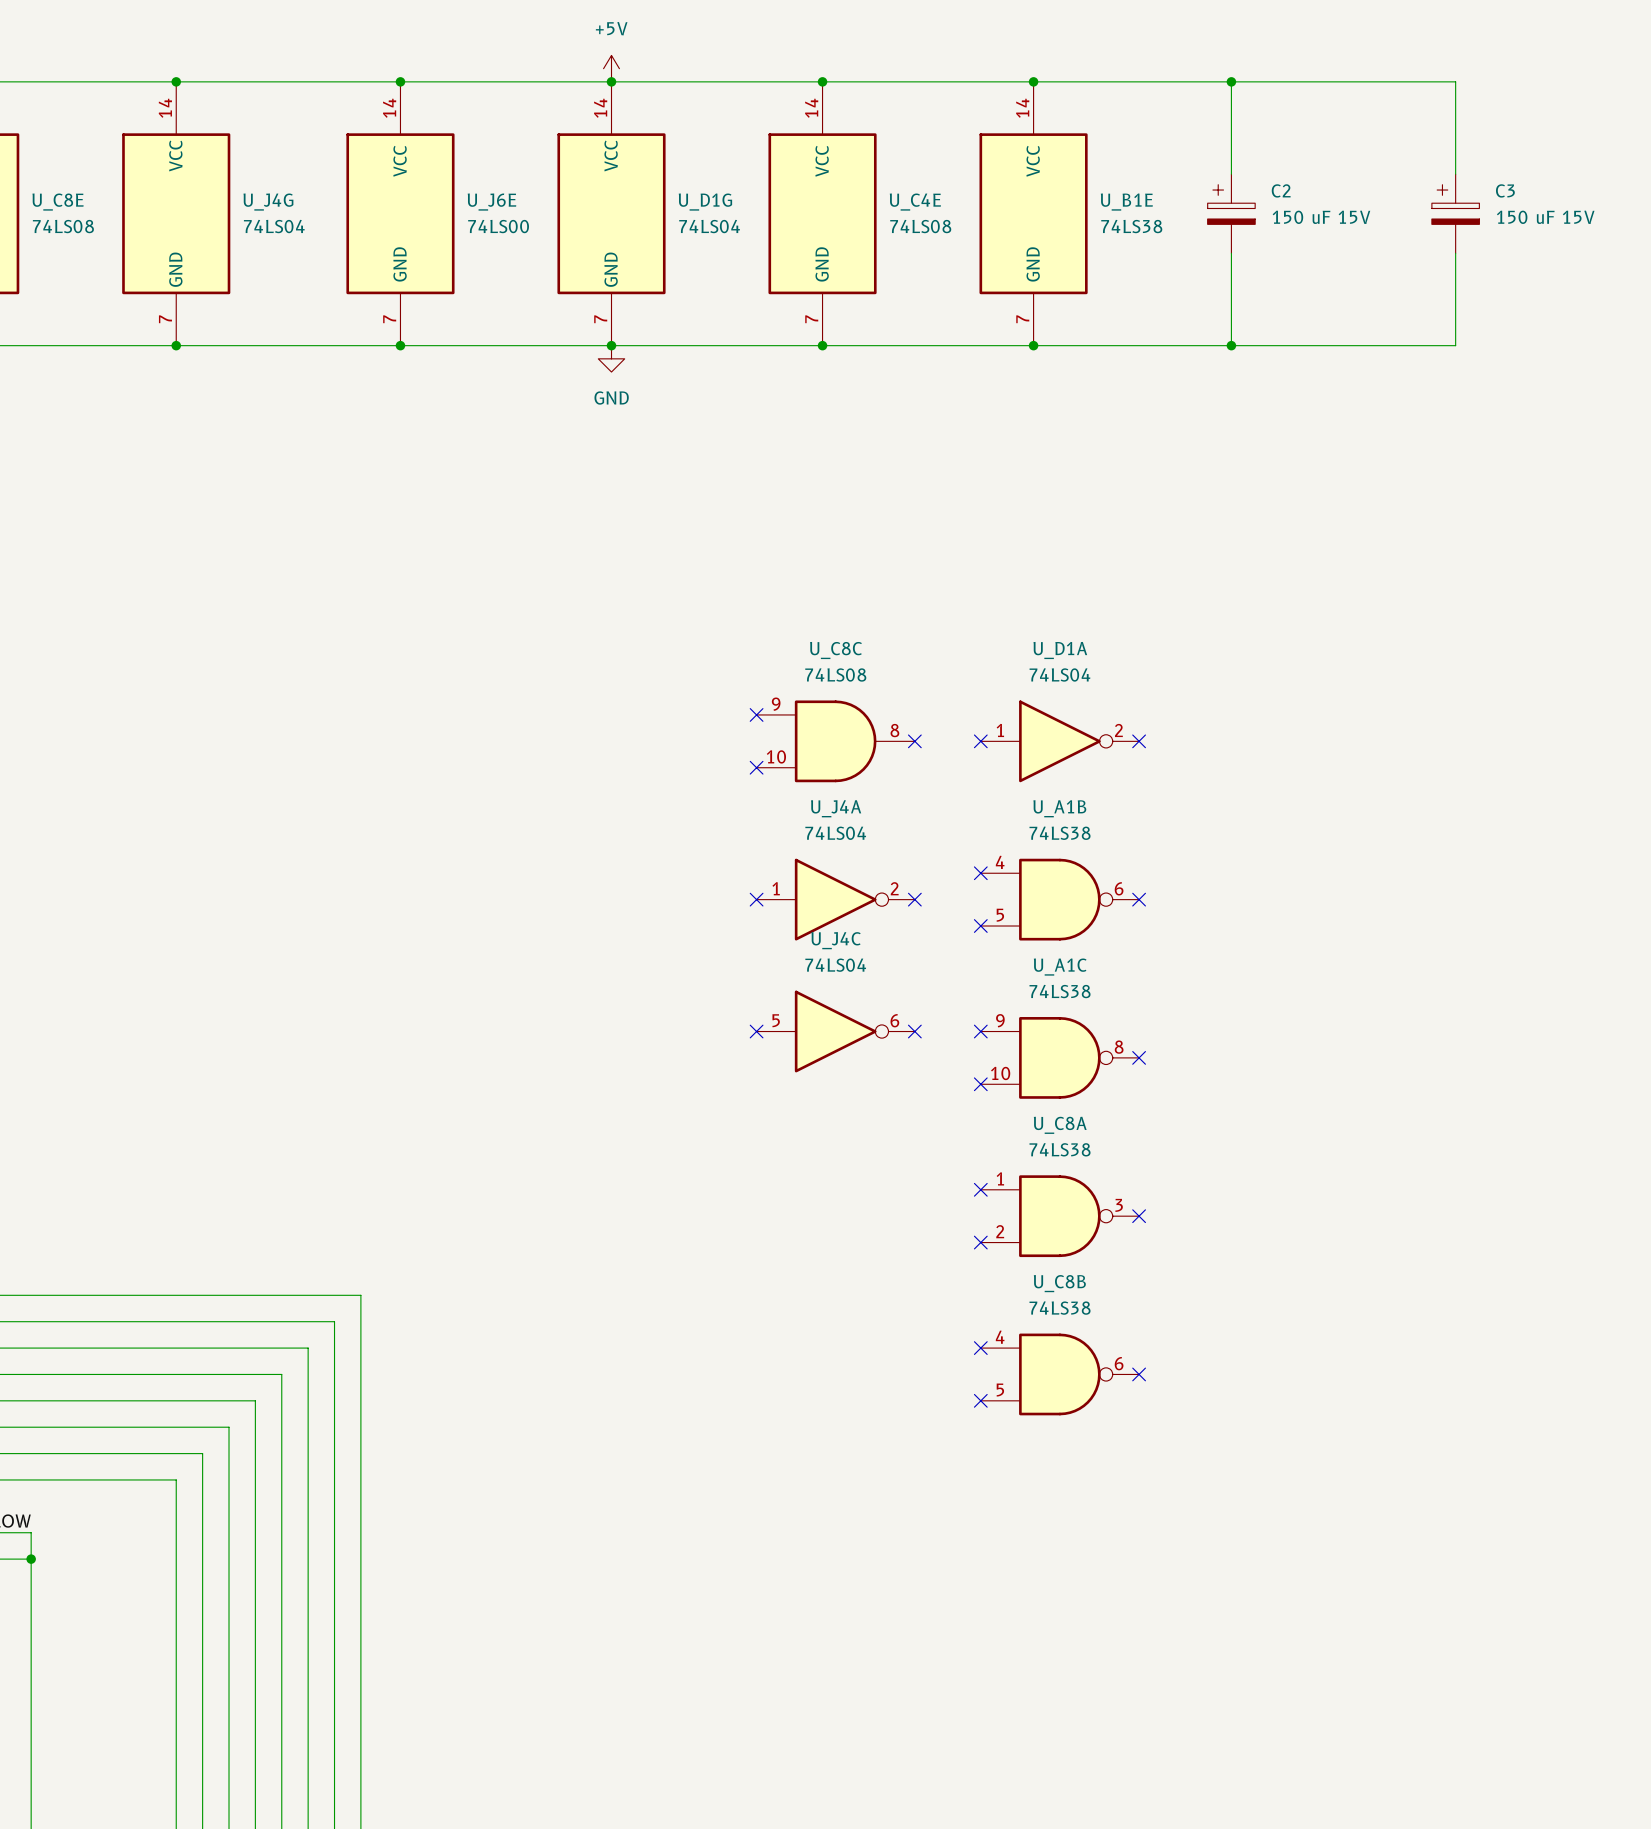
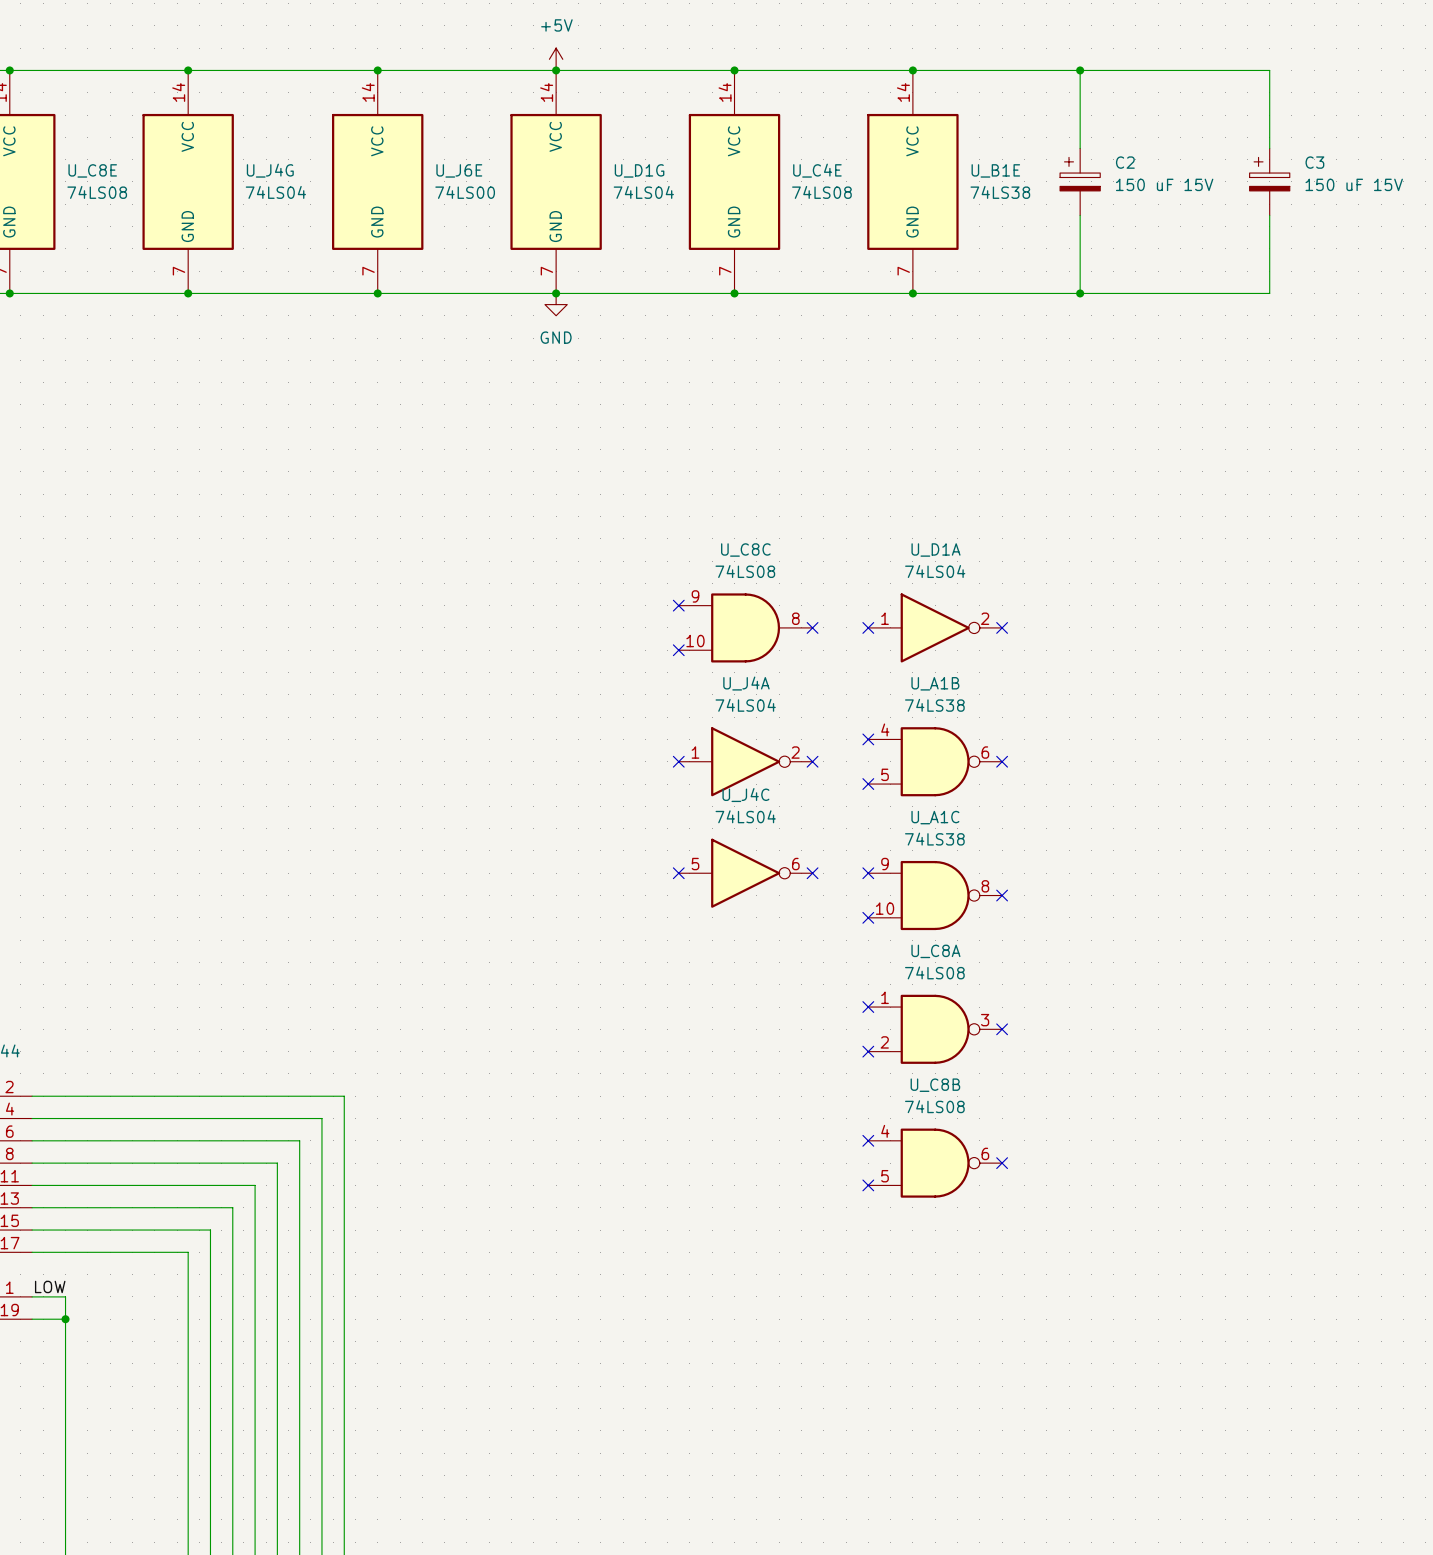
U_C8A value: 74LS38 (1060, 1149) -> 74LS08 (934, 972)
U_C8B value: 74LS38 (1060, 1308) -> 74LS08 (934, 1106)

